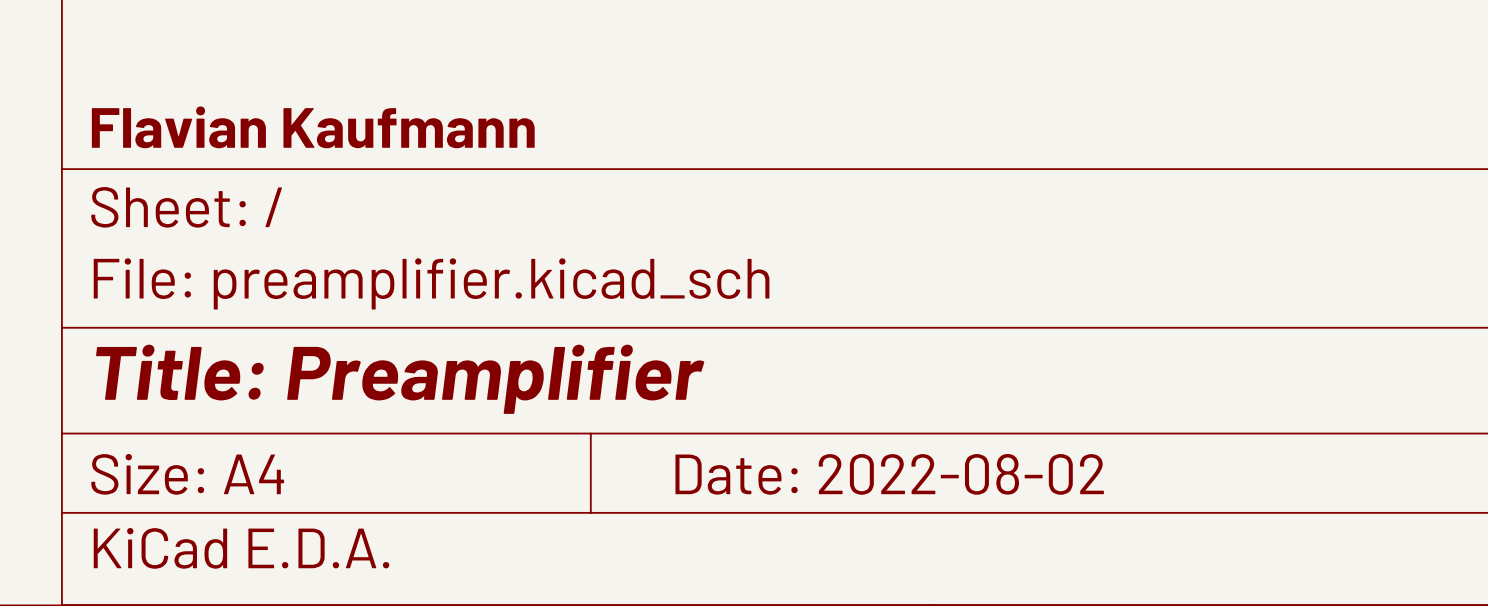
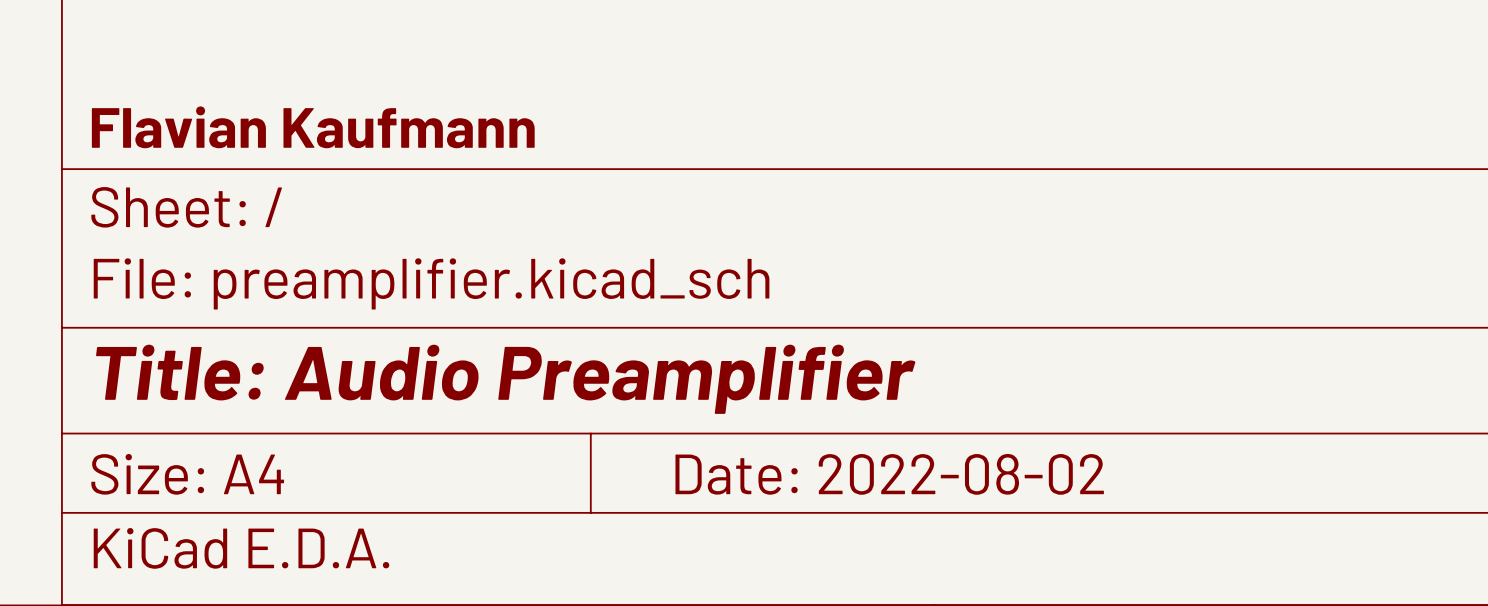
title block: Title: Preamplifier (400, 379) -> Title: Audio Preamplifier (505, 379)

